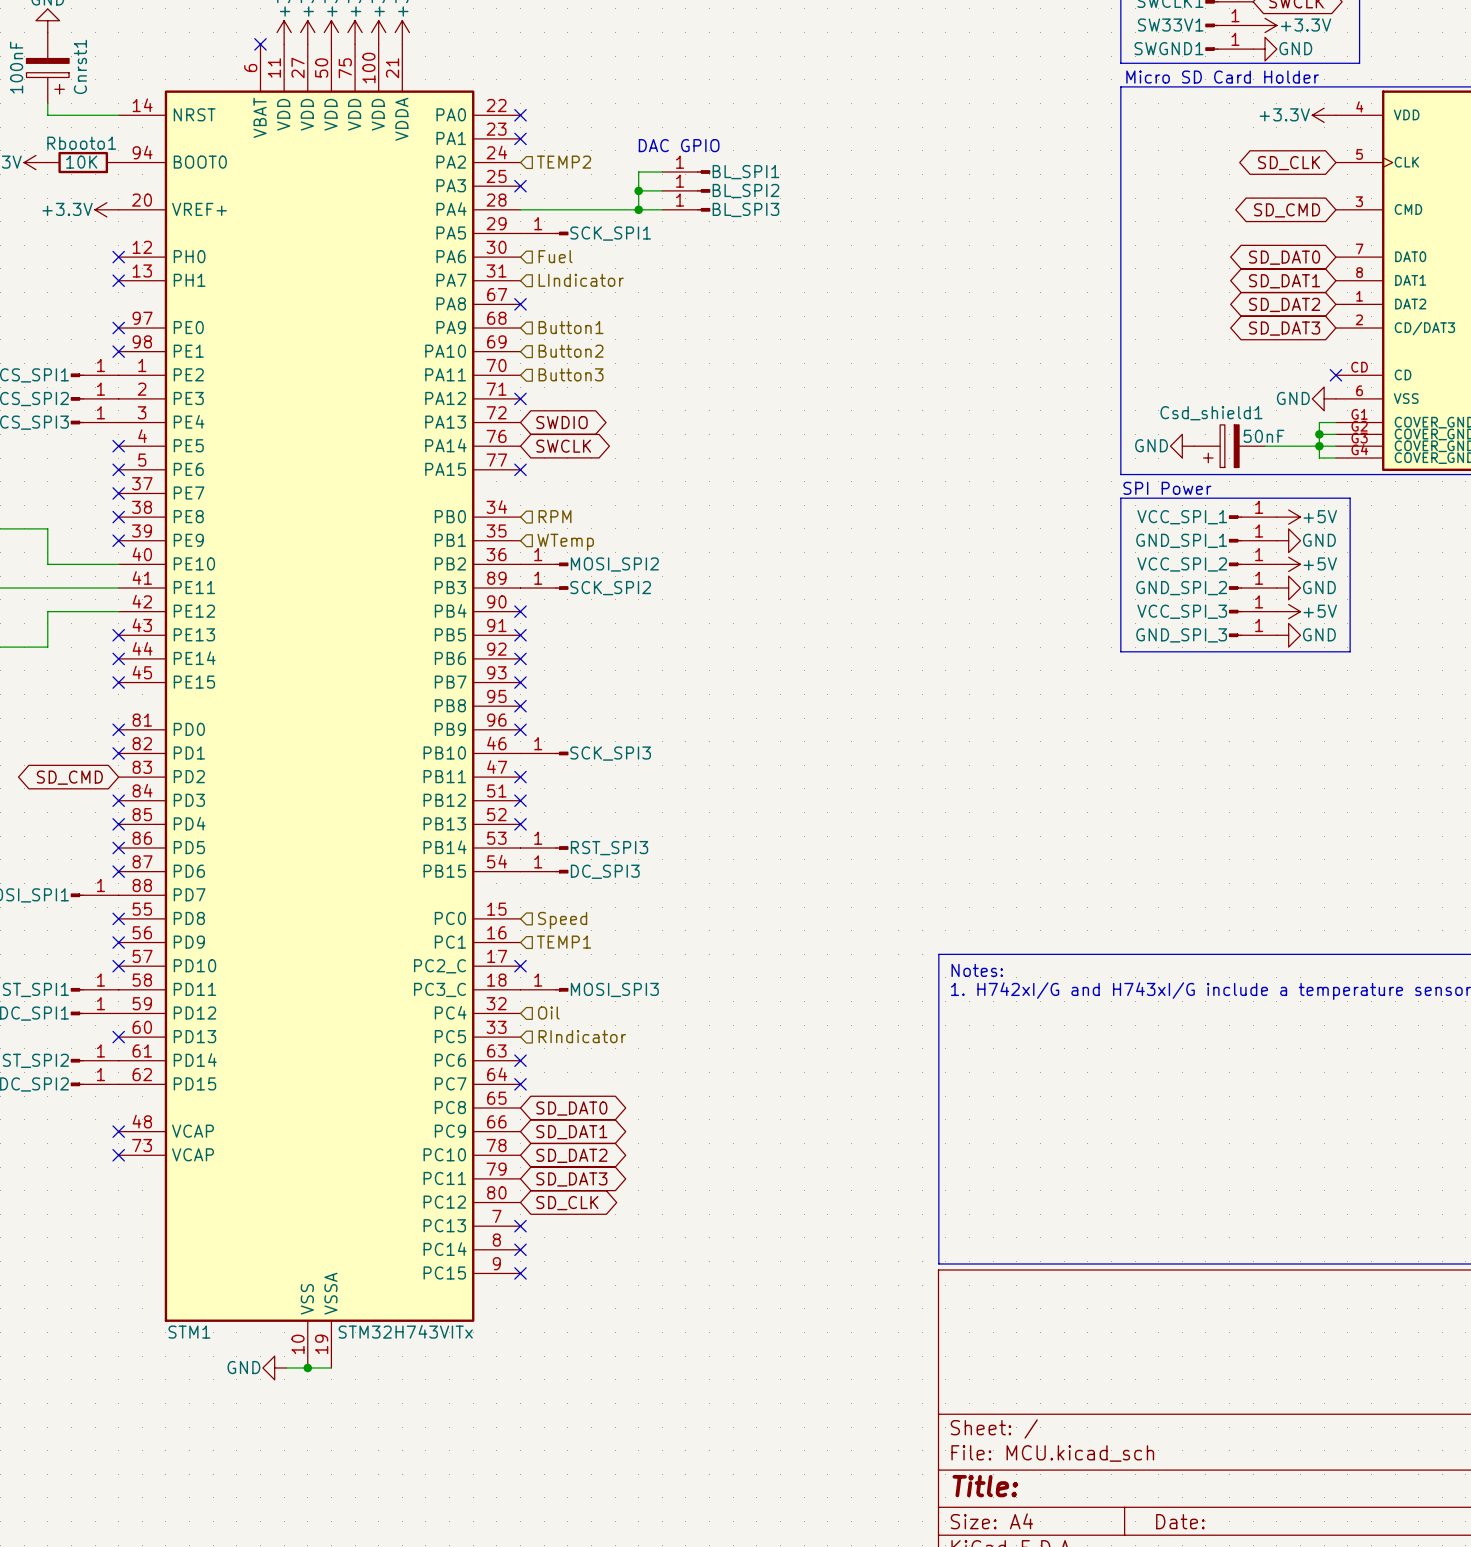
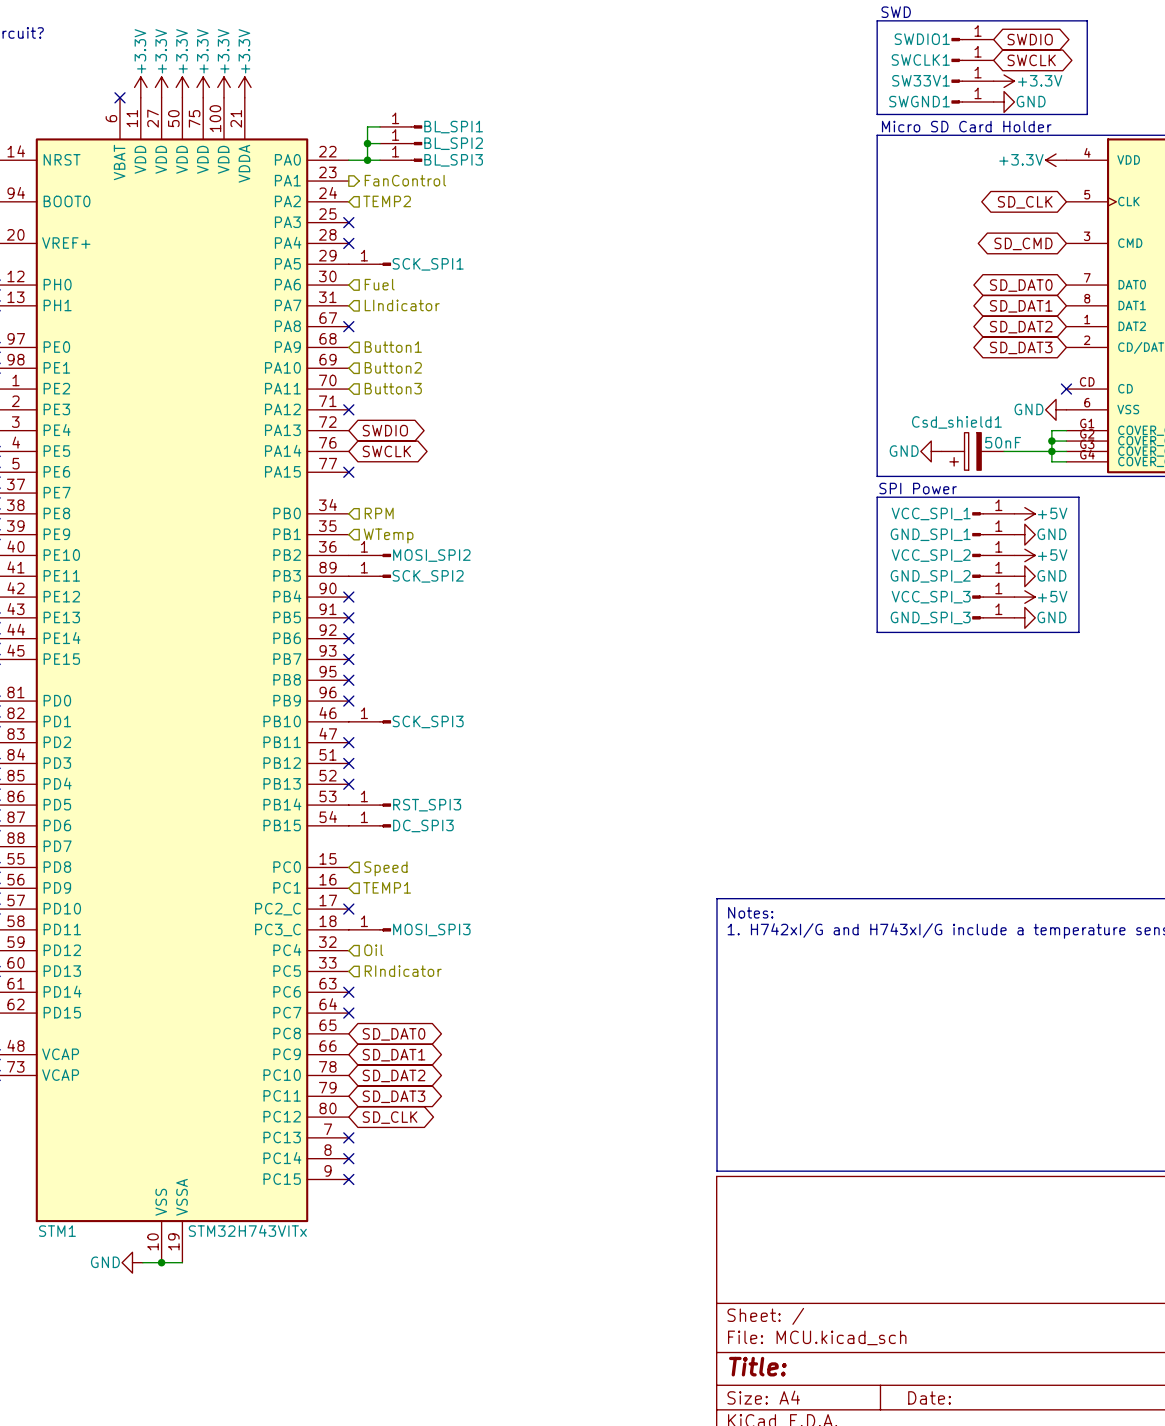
wire: none -> (380, 126) (367, 126) (367, 160)
wire: none -> (367, 143) (380, 143)
junction: none -> (367, 143)
wire: none -> (348, 160) (380, 160)
no-connect mark: (520, 115) -> none
junction: none -> (367, 160)
no-connect mark: (520, 138) -> none
hierarchical label: none -> FanControl (405, 180)
text: DAC GPIO (679, 145) -> none
wire: (662, 172) (638, 172) (638, 209) -> none
BL_SPI1 position: (686, 172) -> (401, 126)
wire: (638, 190) (662, 190) -> none
junction: (638, 190) -> none
BL_SPI2 position: (686, 190) -> (401, 143)
wire: (520, 209) (662, 209) -> none
no-connect mark: none -> (348, 243)
junction: (638, 209) -> none
BL_SPI3 position: (686, 209) -> (401, 160)

